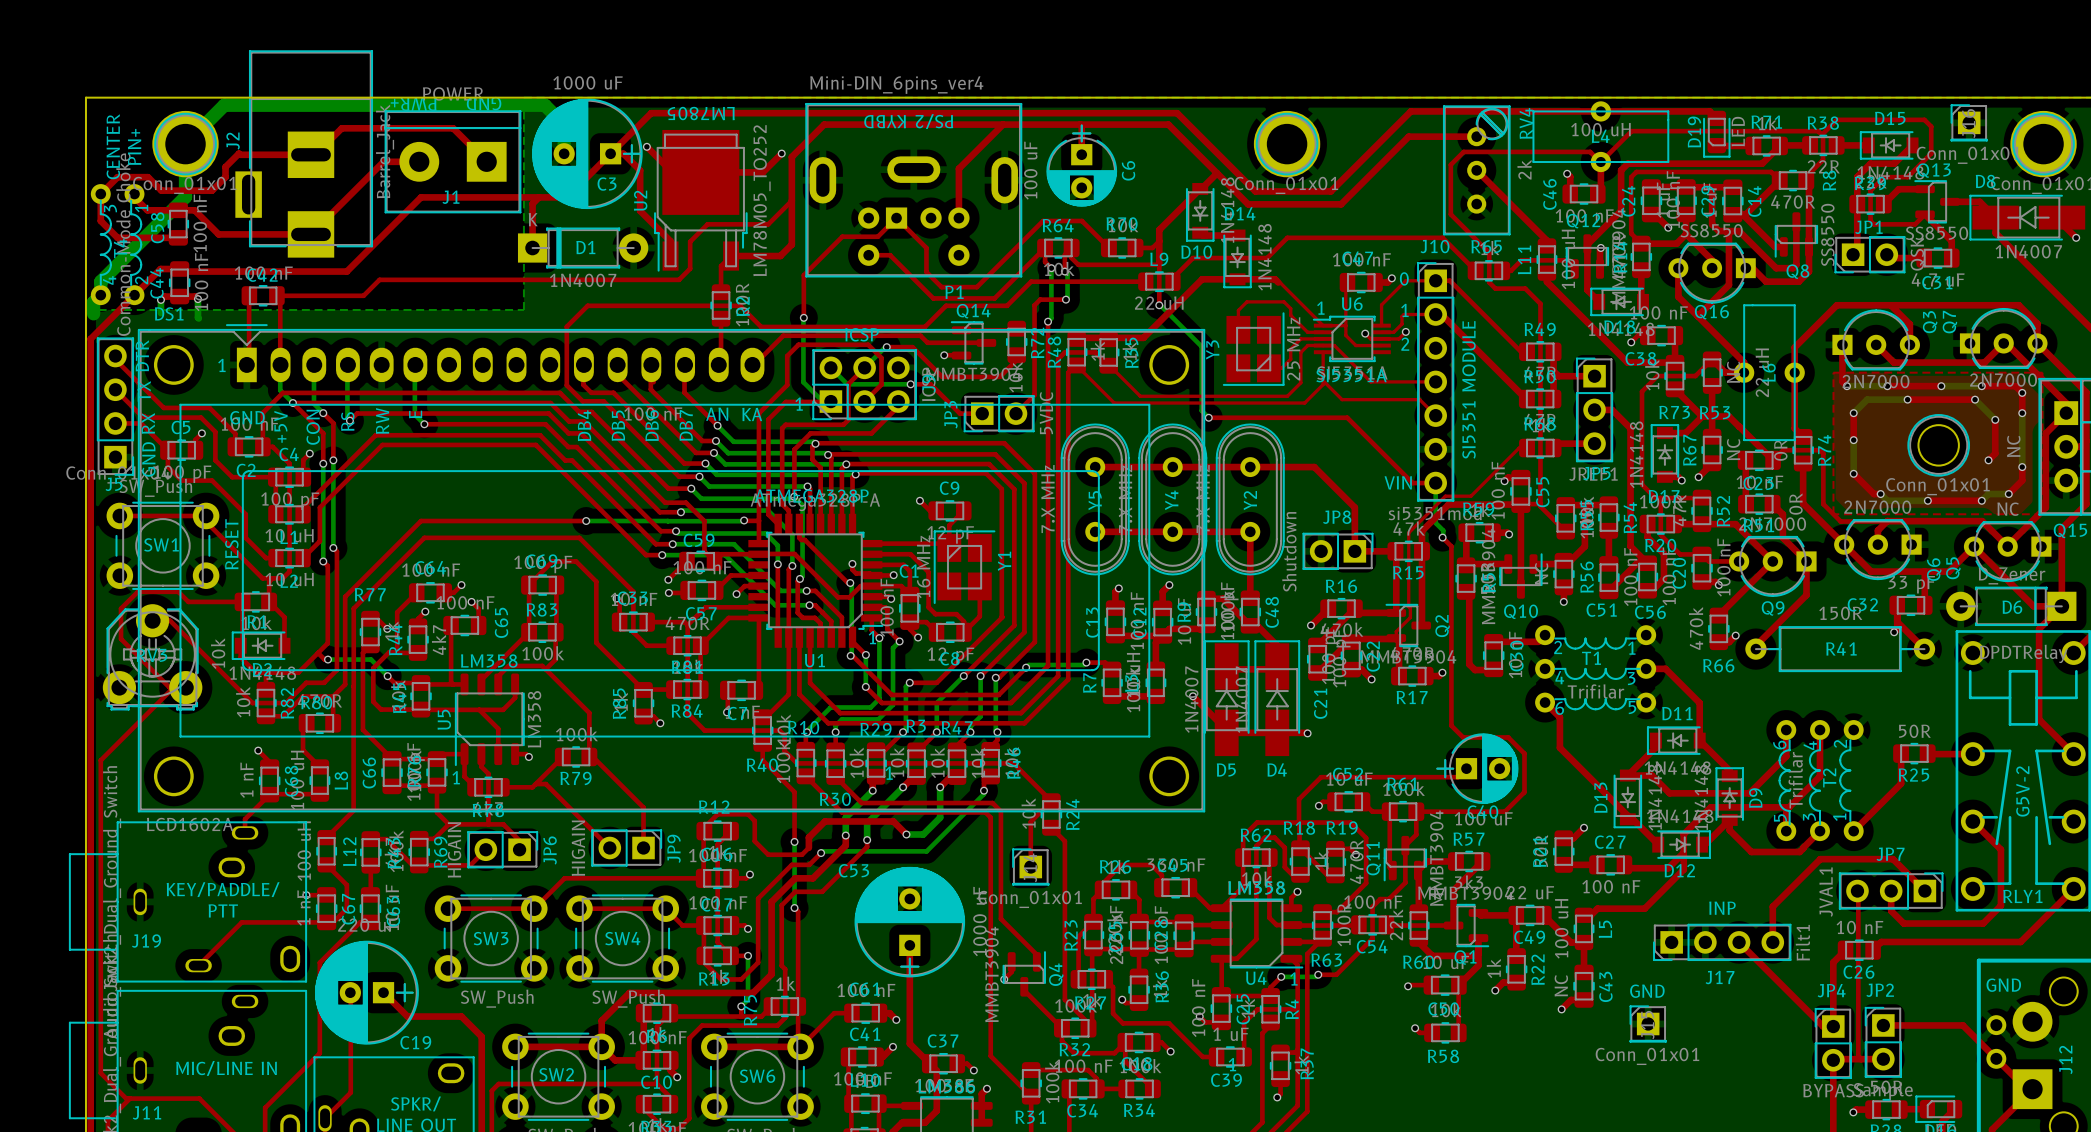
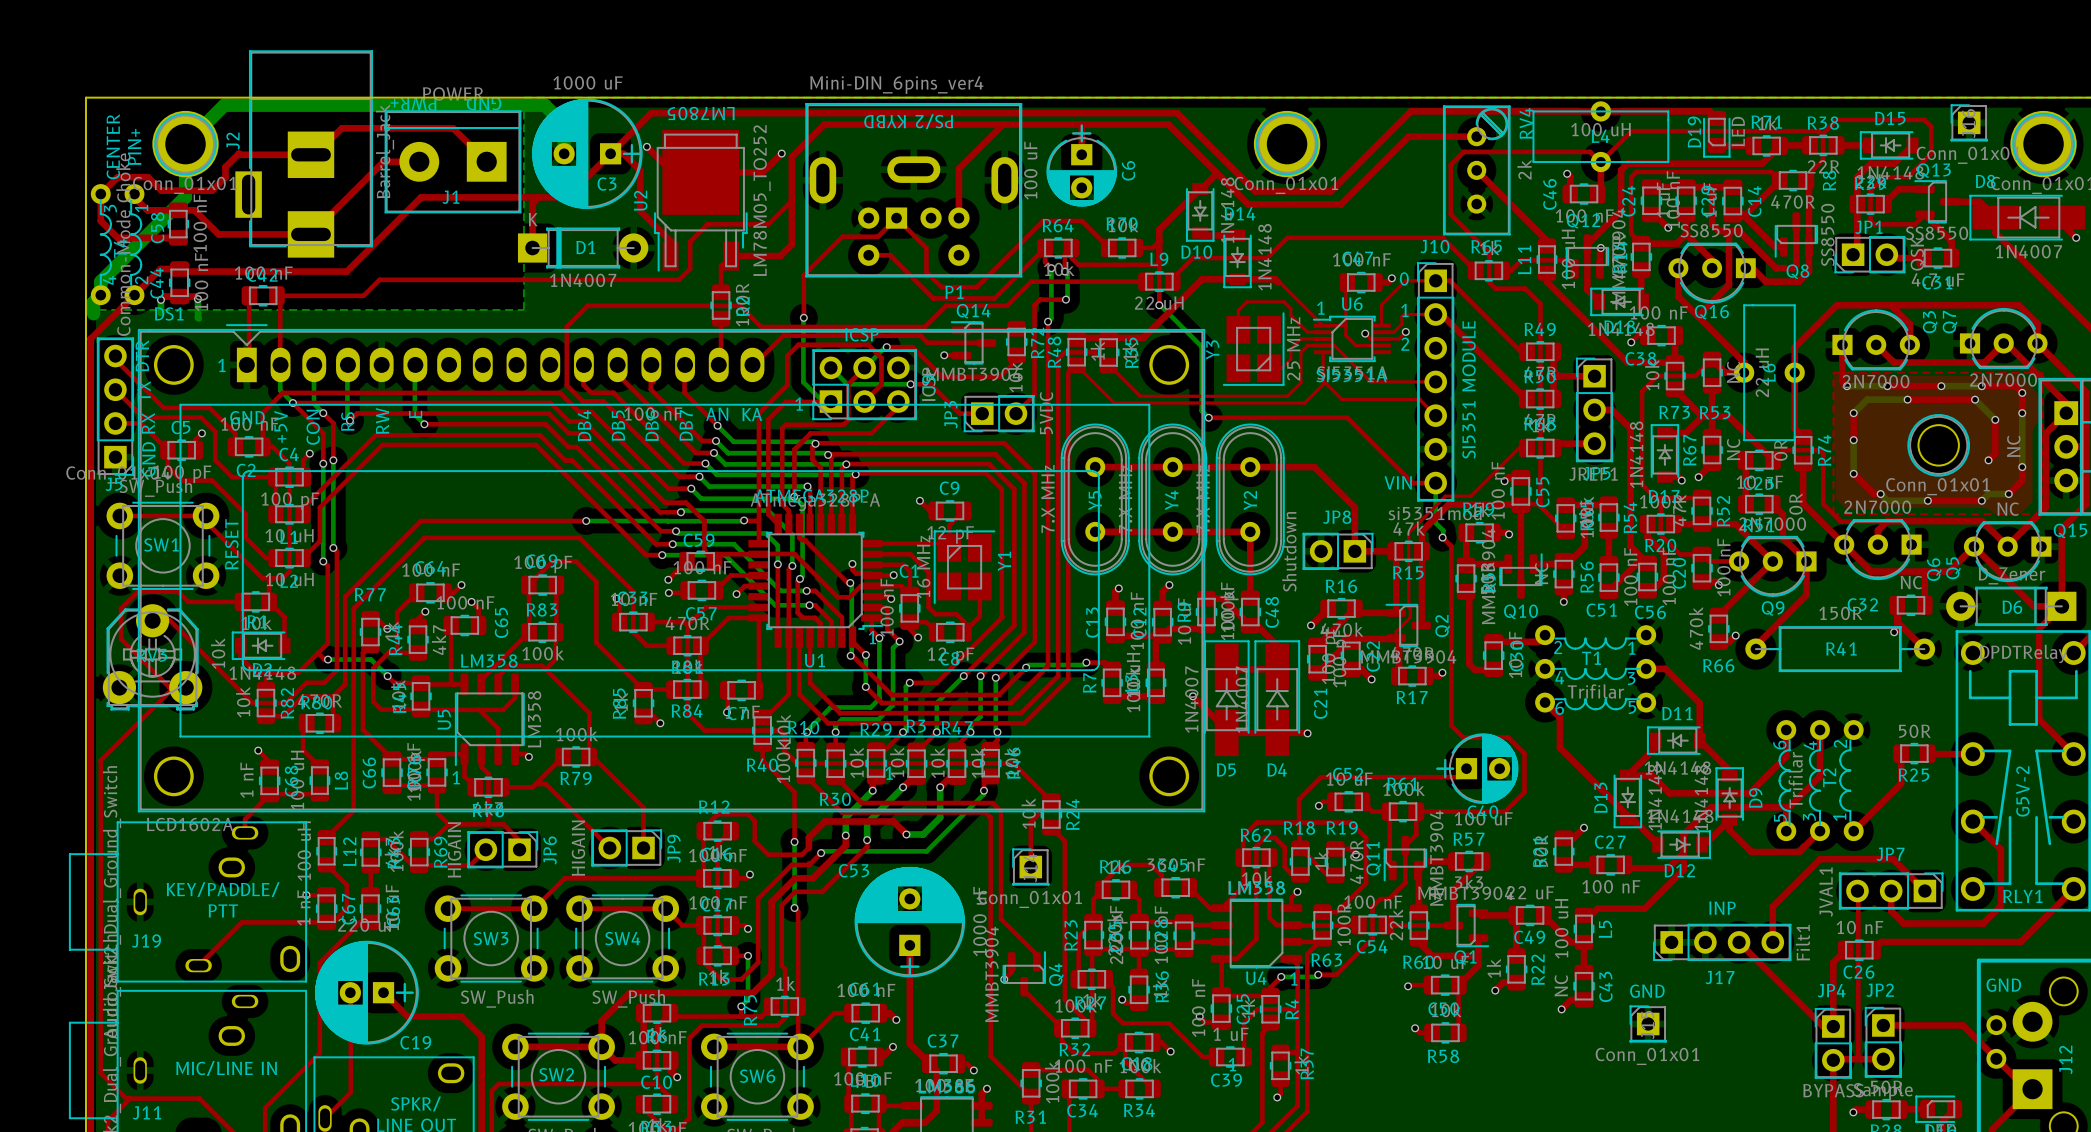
C32 value: 33 pF (1911, 584) -> NC (1911, 582)

